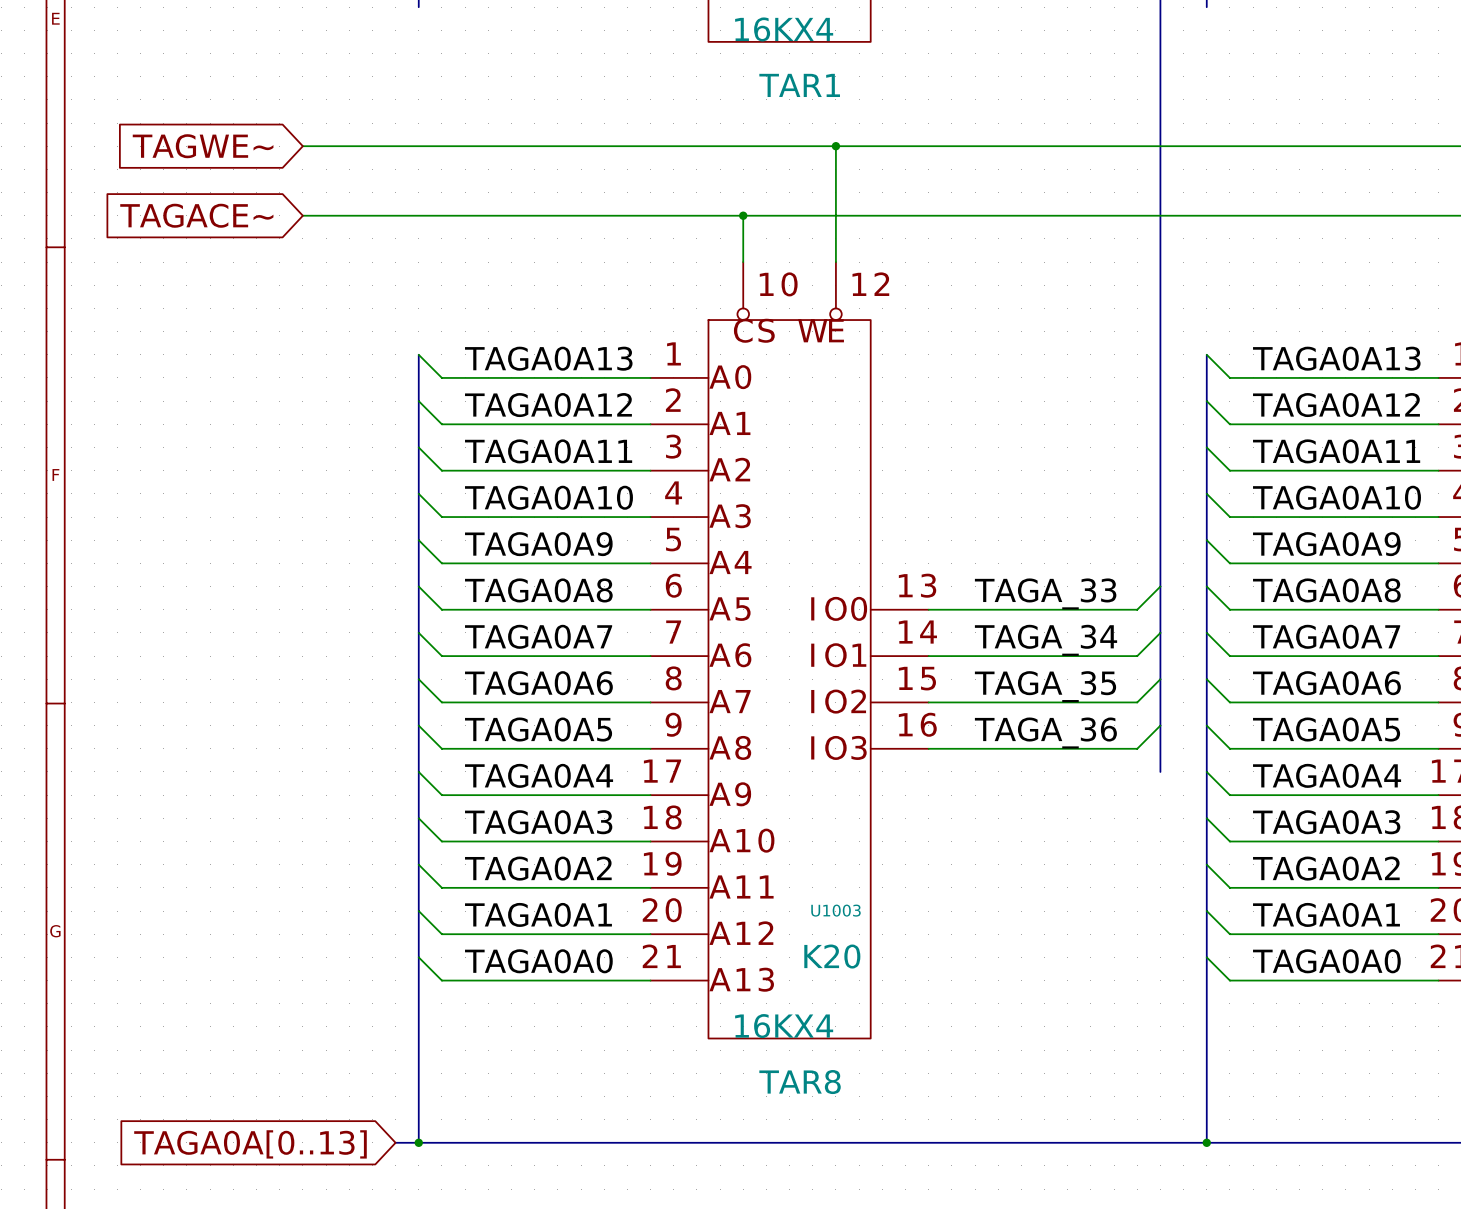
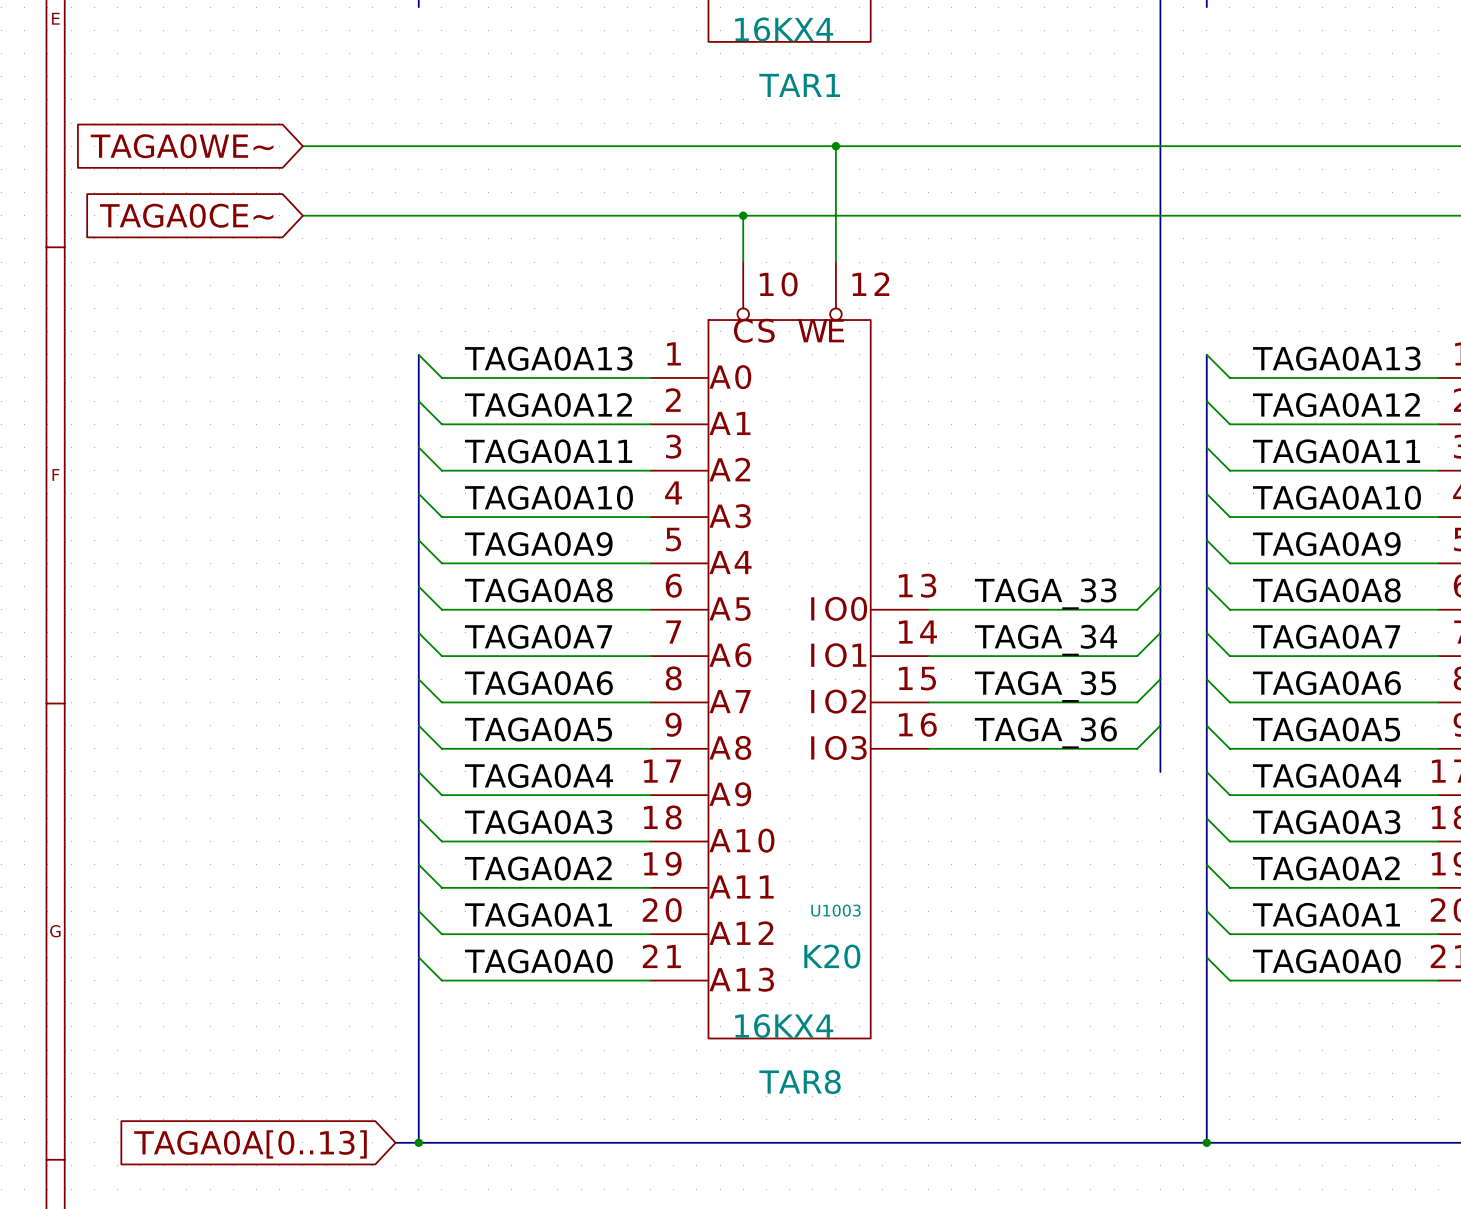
global label: TAGWE~ (203, 146) -> TAGA0WE~ (182, 146)
global label: TAGACE~ (196, 215) -> TAGA0CE~ (186, 215)

